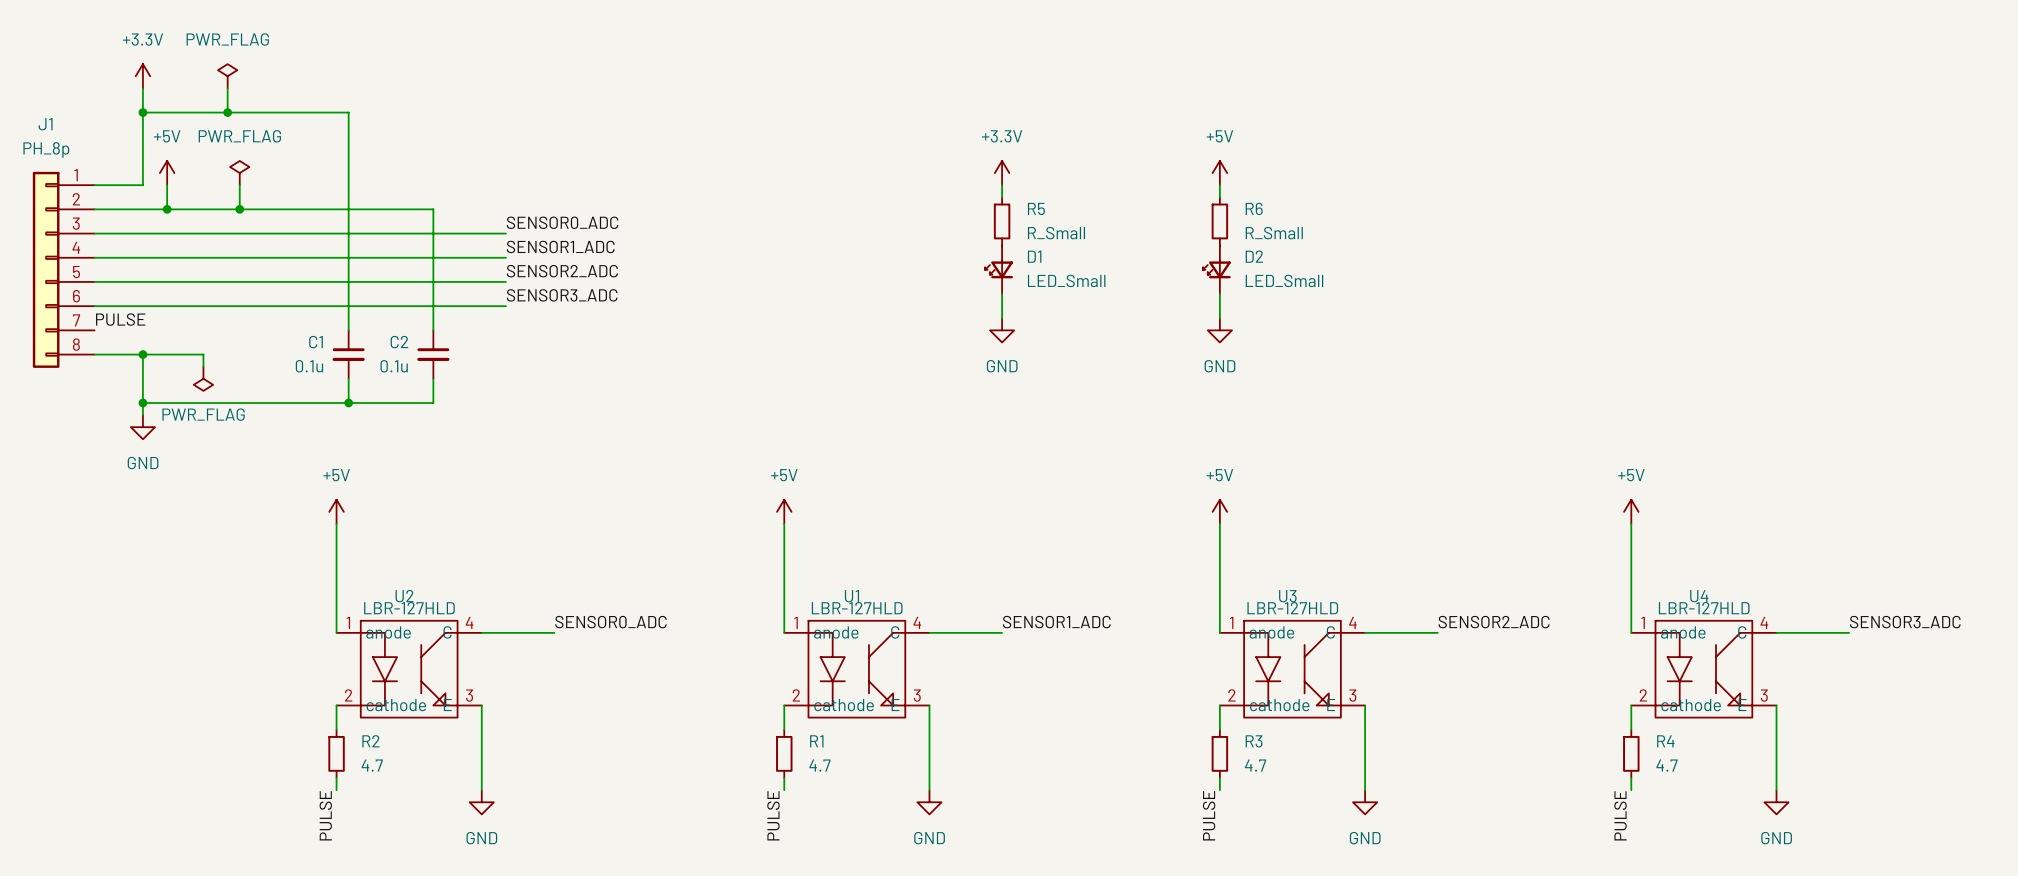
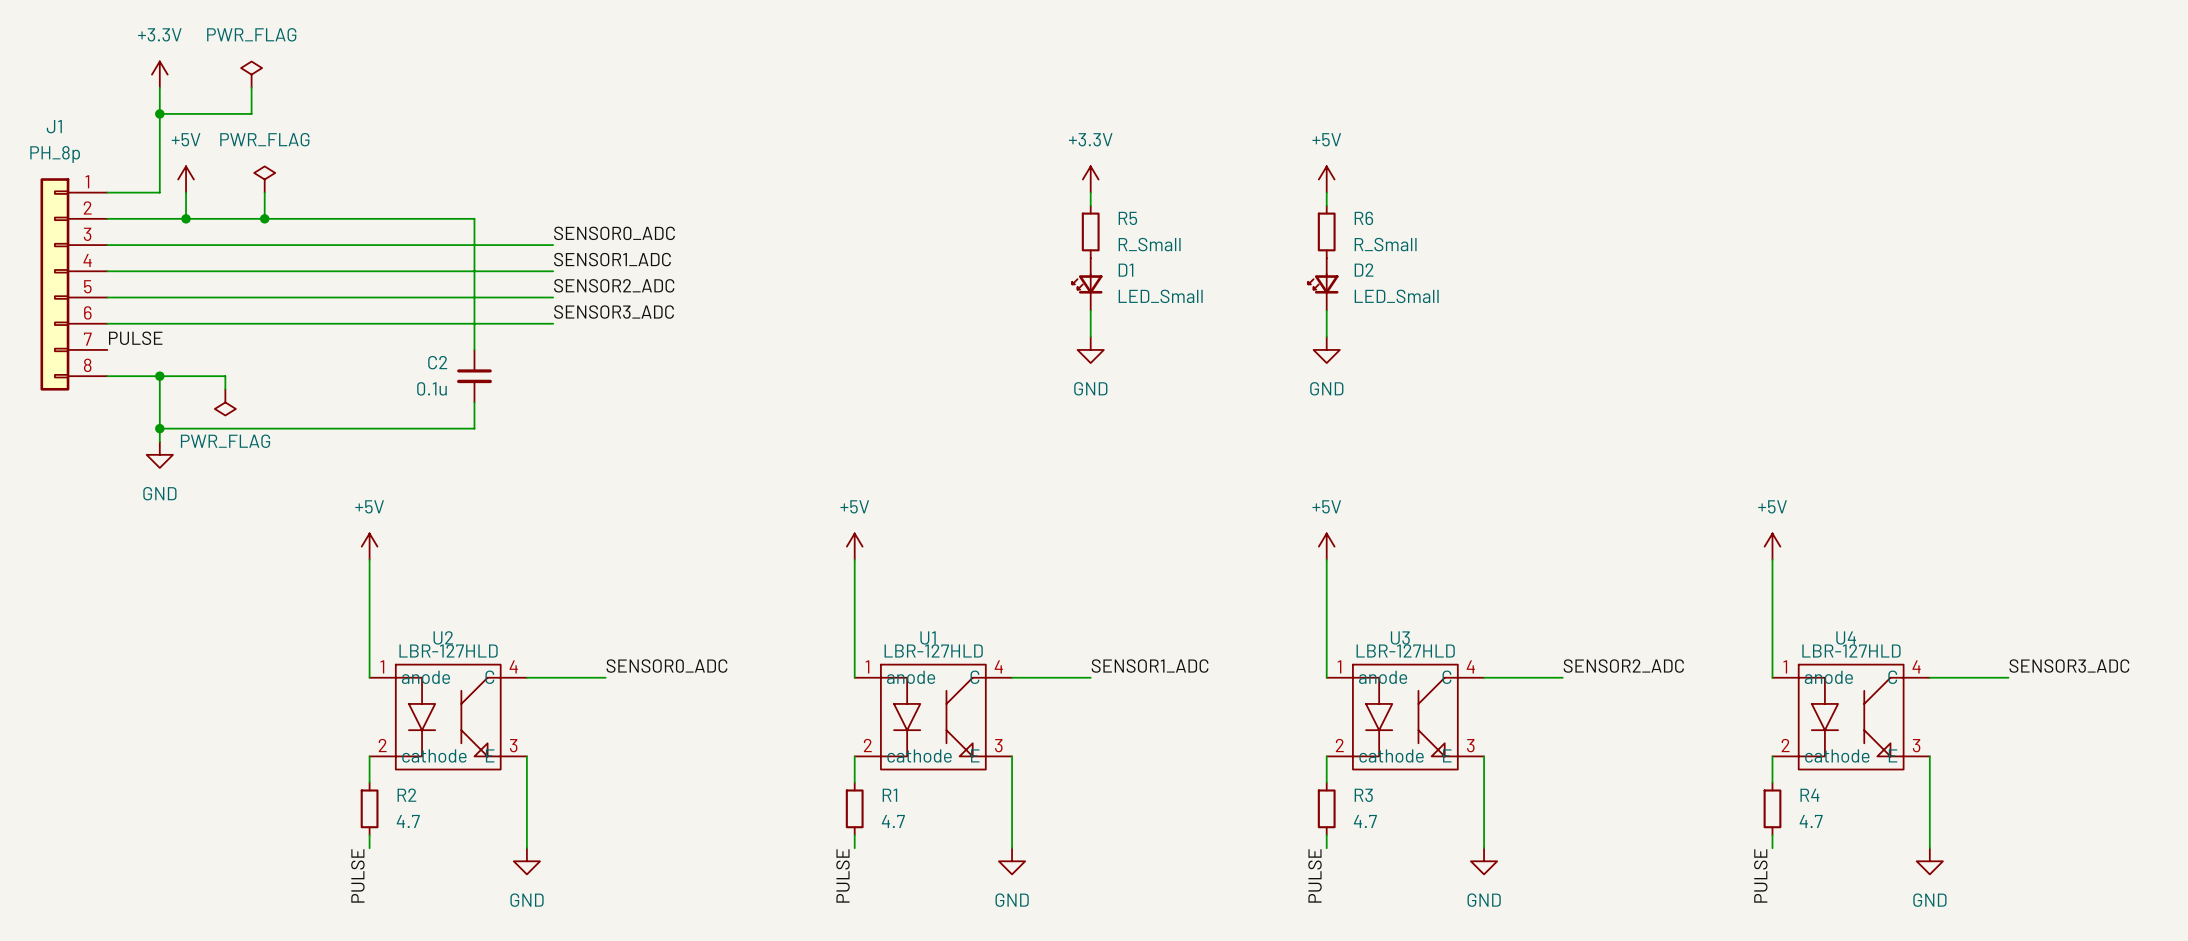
wire: (227, 112) (348, 112) (348, 330) -> none
junction: (227, 112) -> none
C1: 0.1u (348, 354) -> none
wire: (348, 378) (348, 402) -> none
junction: (348, 402) -> none

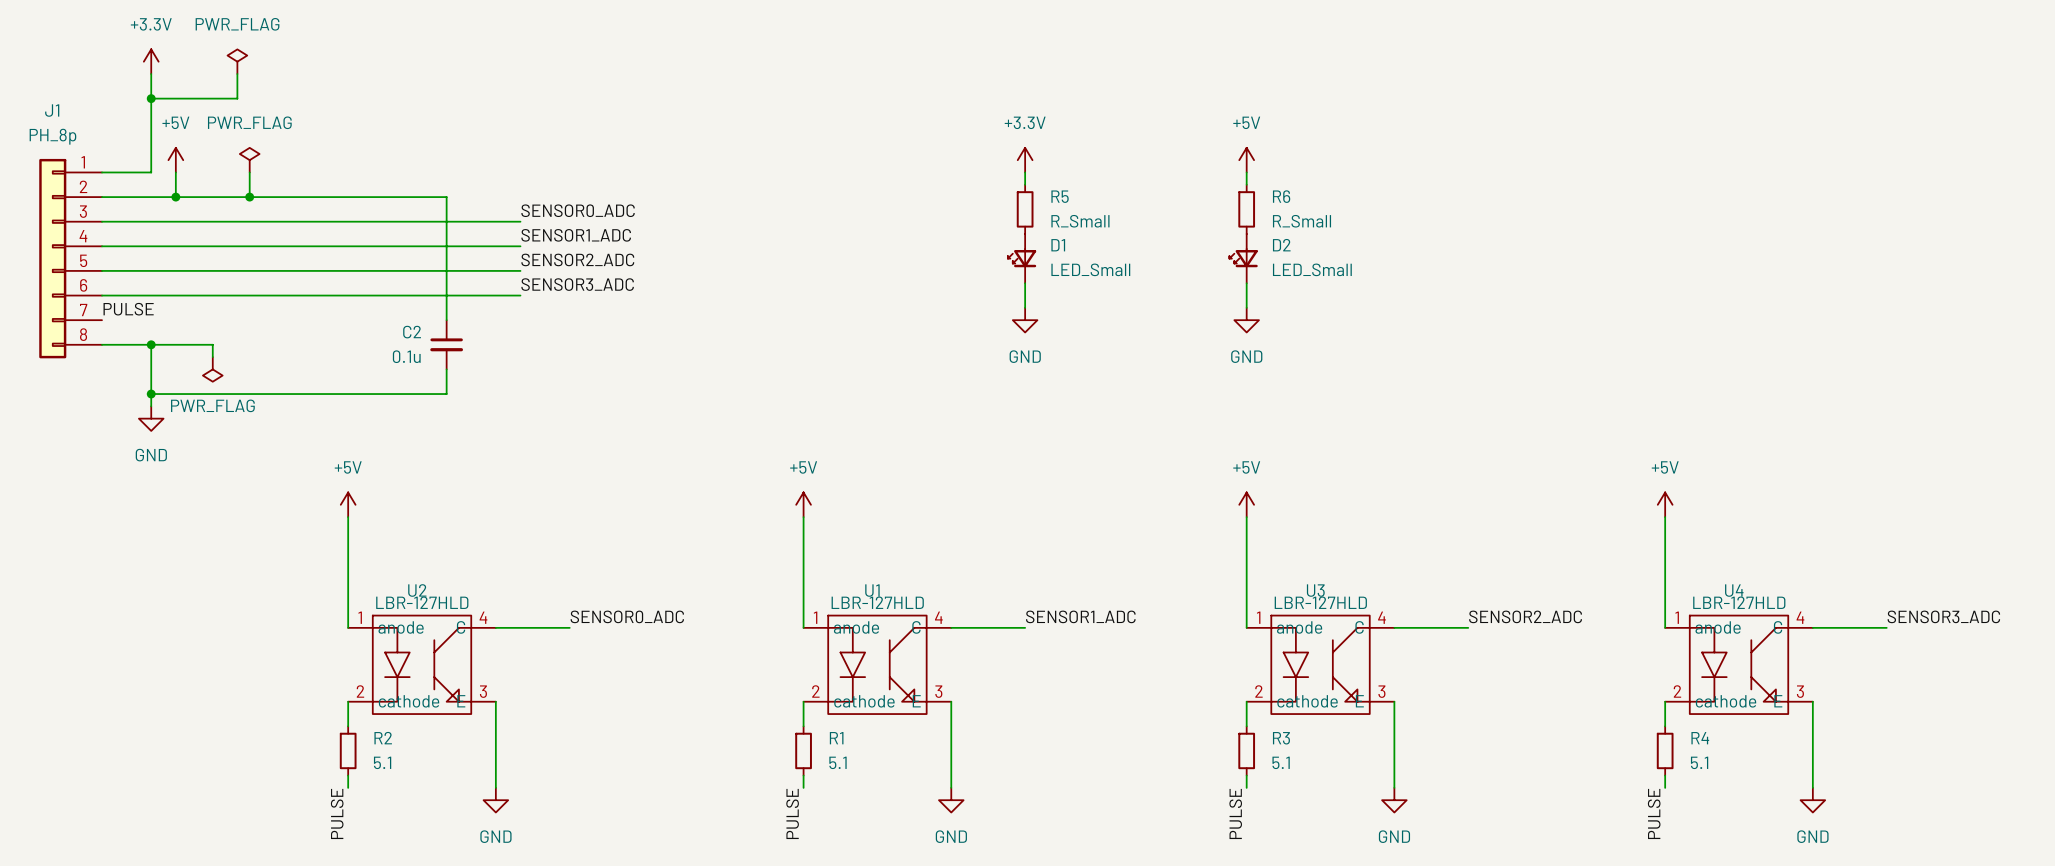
R2 value: 4.7 (408, 821) -> 5.1 (382, 762)
R1 value: 4.7 (893, 821) -> 5.1 (837, 762)
R3 value: 4.7 (1365, 821) -> 5.1 (1281, 762)
R4 value: 4.7 (1811, 821) -> 5.1 (1699, 762)

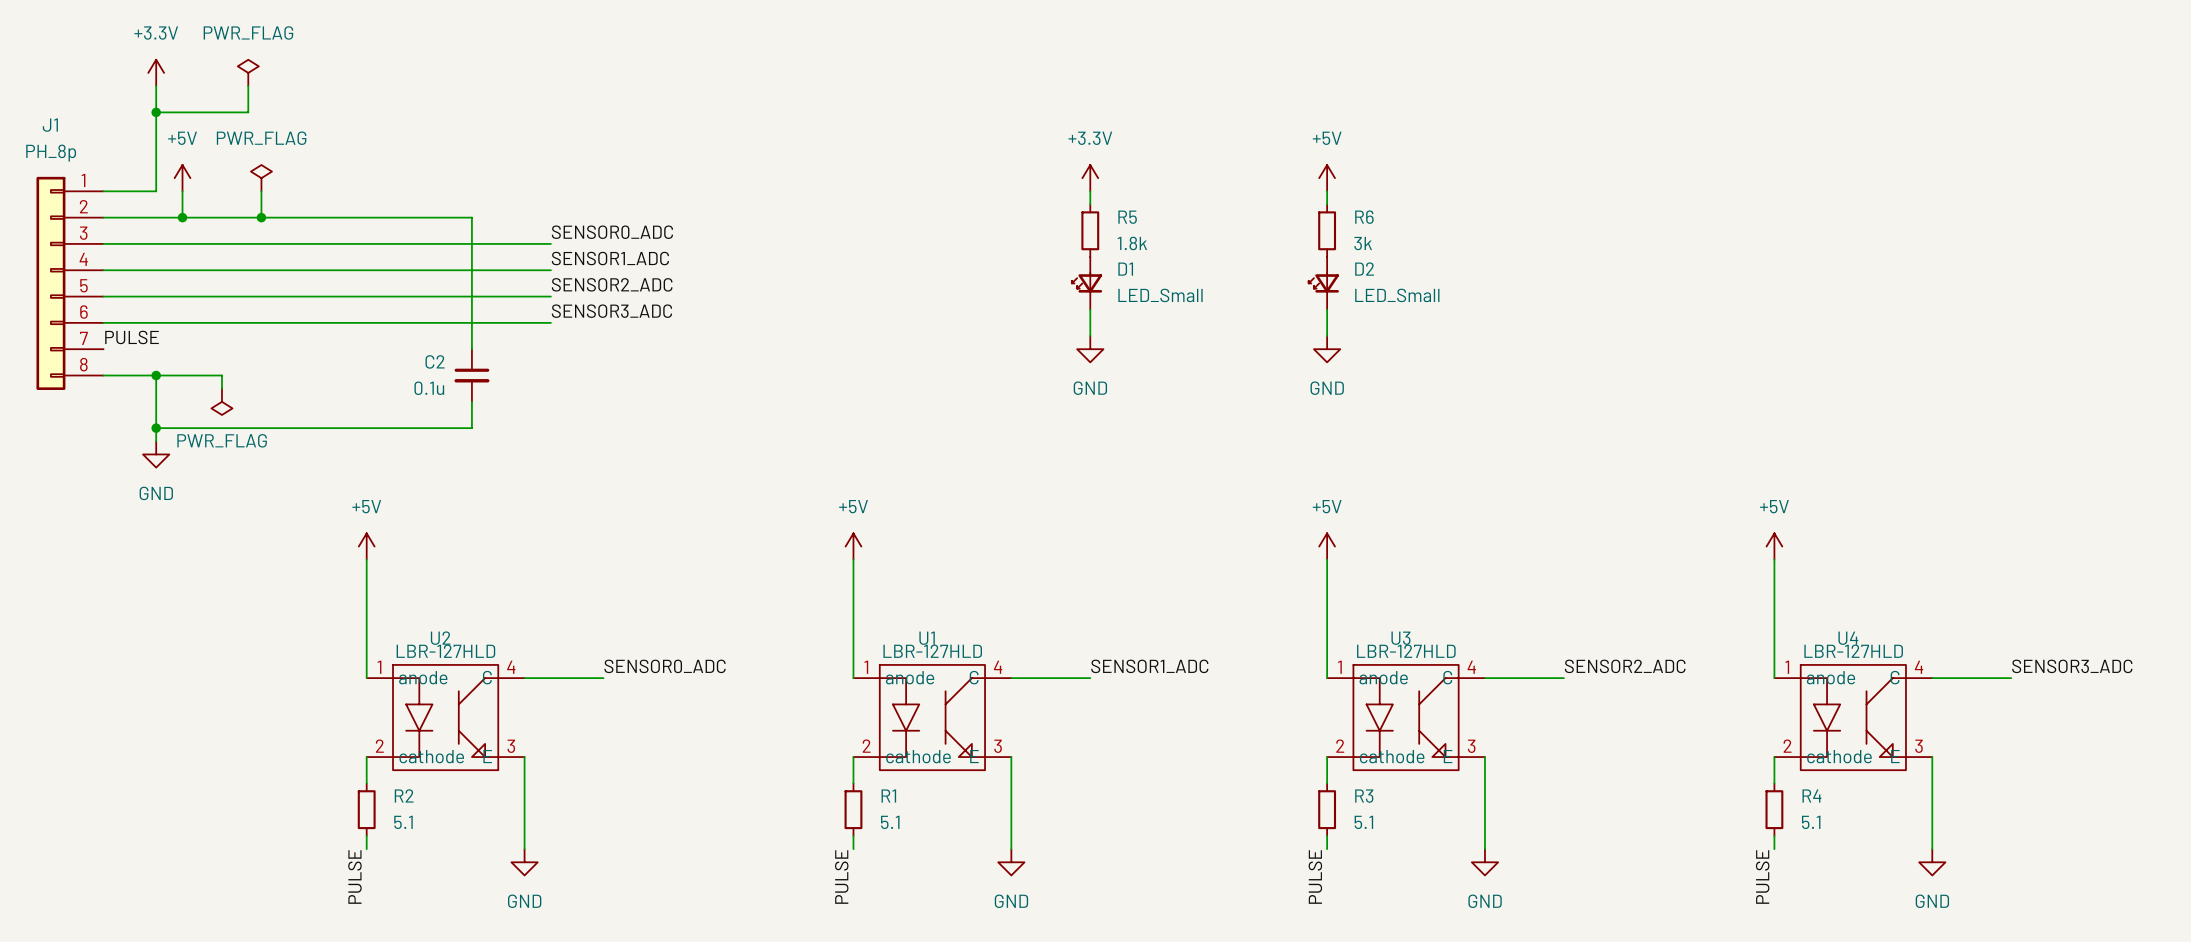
R5 value: R_Small (1080, 221) -> 1.8k (1132, 243)
R6 value: R_Small (1302, 221) -> 3k (1363, 243)

